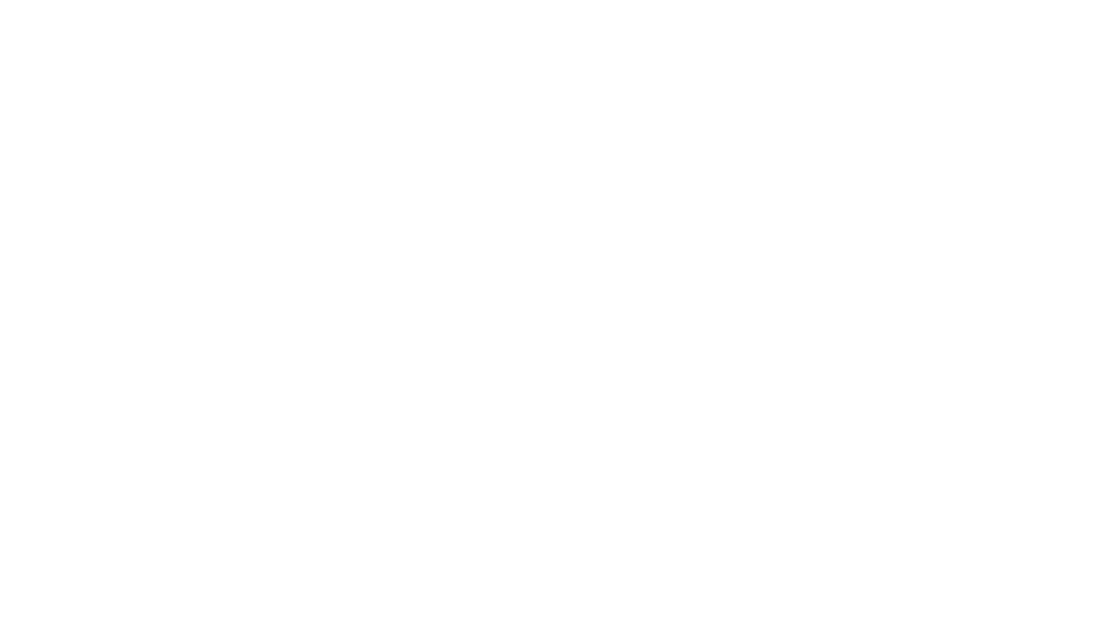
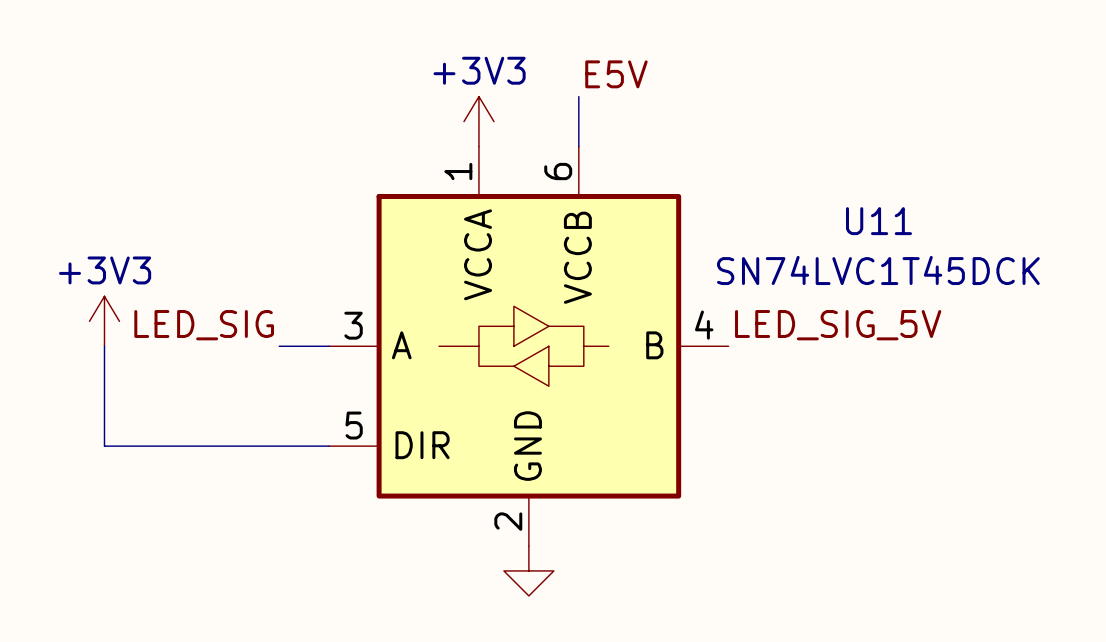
label: none -> E5V (616, 74)
wire: none -> (578, 96) (578, 146)
power symbol: none -> +3V3 (478, 121)
power symbol: none -> +3V3 (104, 321)
label: none -> LED_SIG (204, 325)
label: none -> LED_SIG_5V (838, 325)
wire: none -> (104, 346) (104, 446) (329, 446)
wire: none -> (279, 346) (329, 346)
U11: none -> SN74LVC1T45DCK (528, 346)
power symbol: none -> (528, 570)

